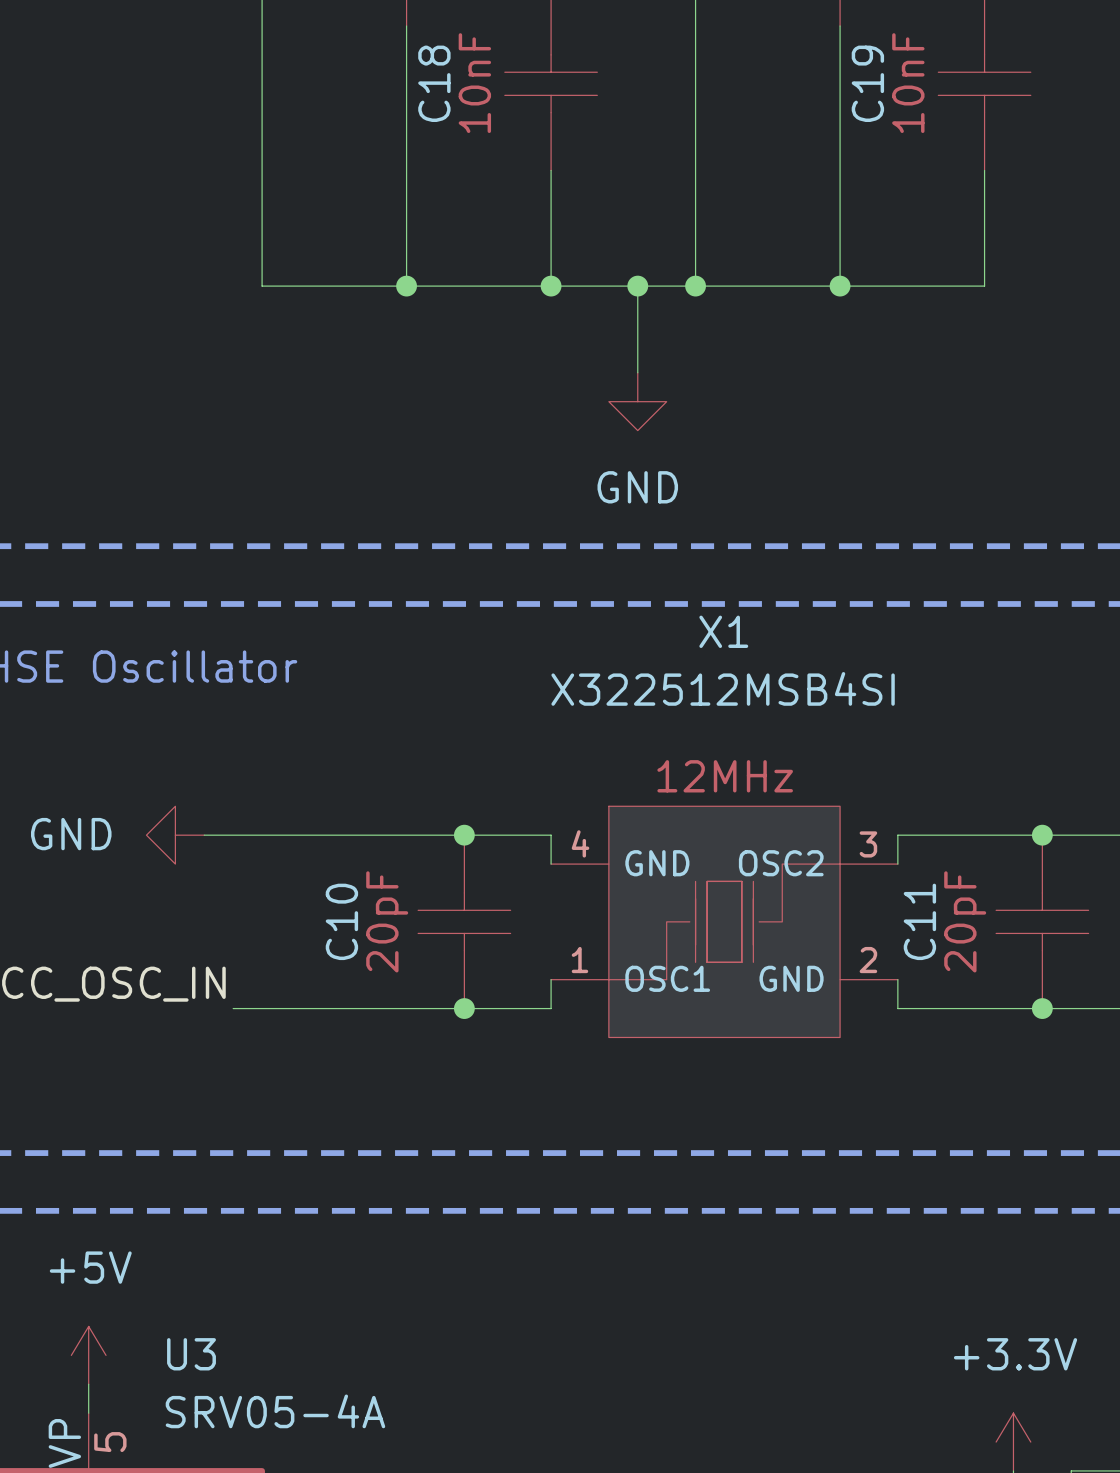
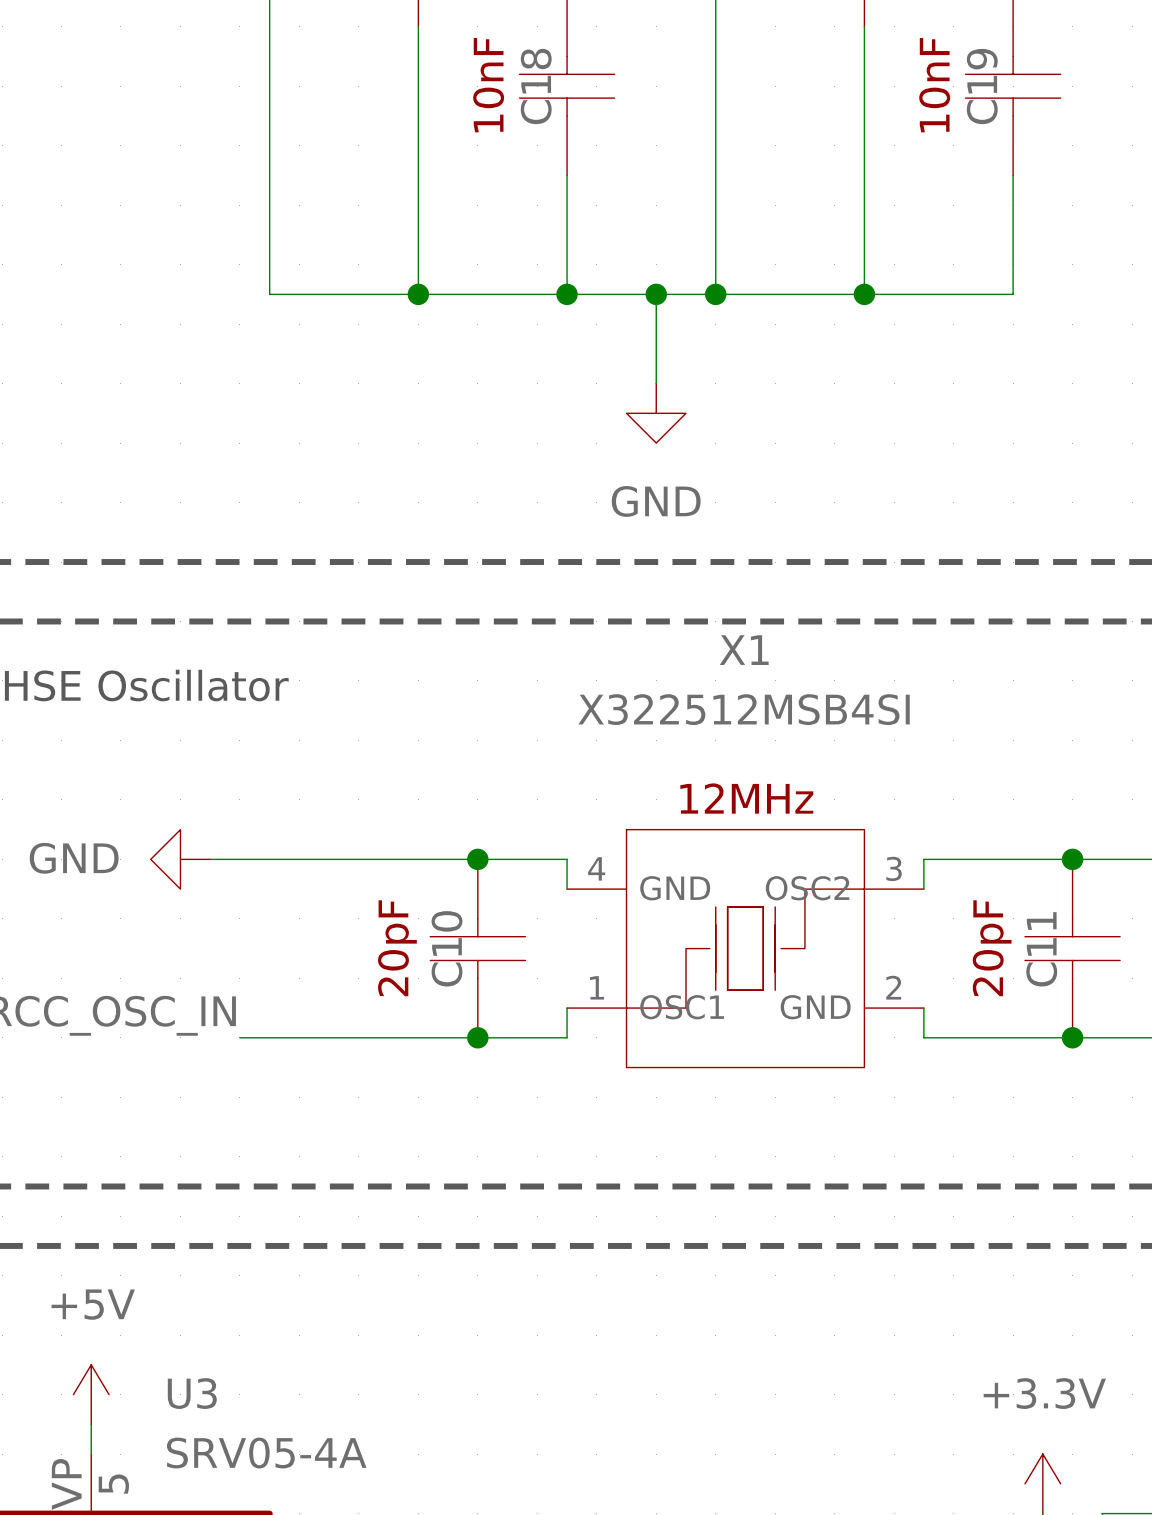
C18 name position: C18 (434, 83) -> C18 (536, 86)
C19 name position: C19 (867, 83) -> C19 (982, 86)
C10 name position: C10 (341, 921) -> C10 (447, 948)
C11 name position: C11 (919, 921) -> C11 (1041, 949)

